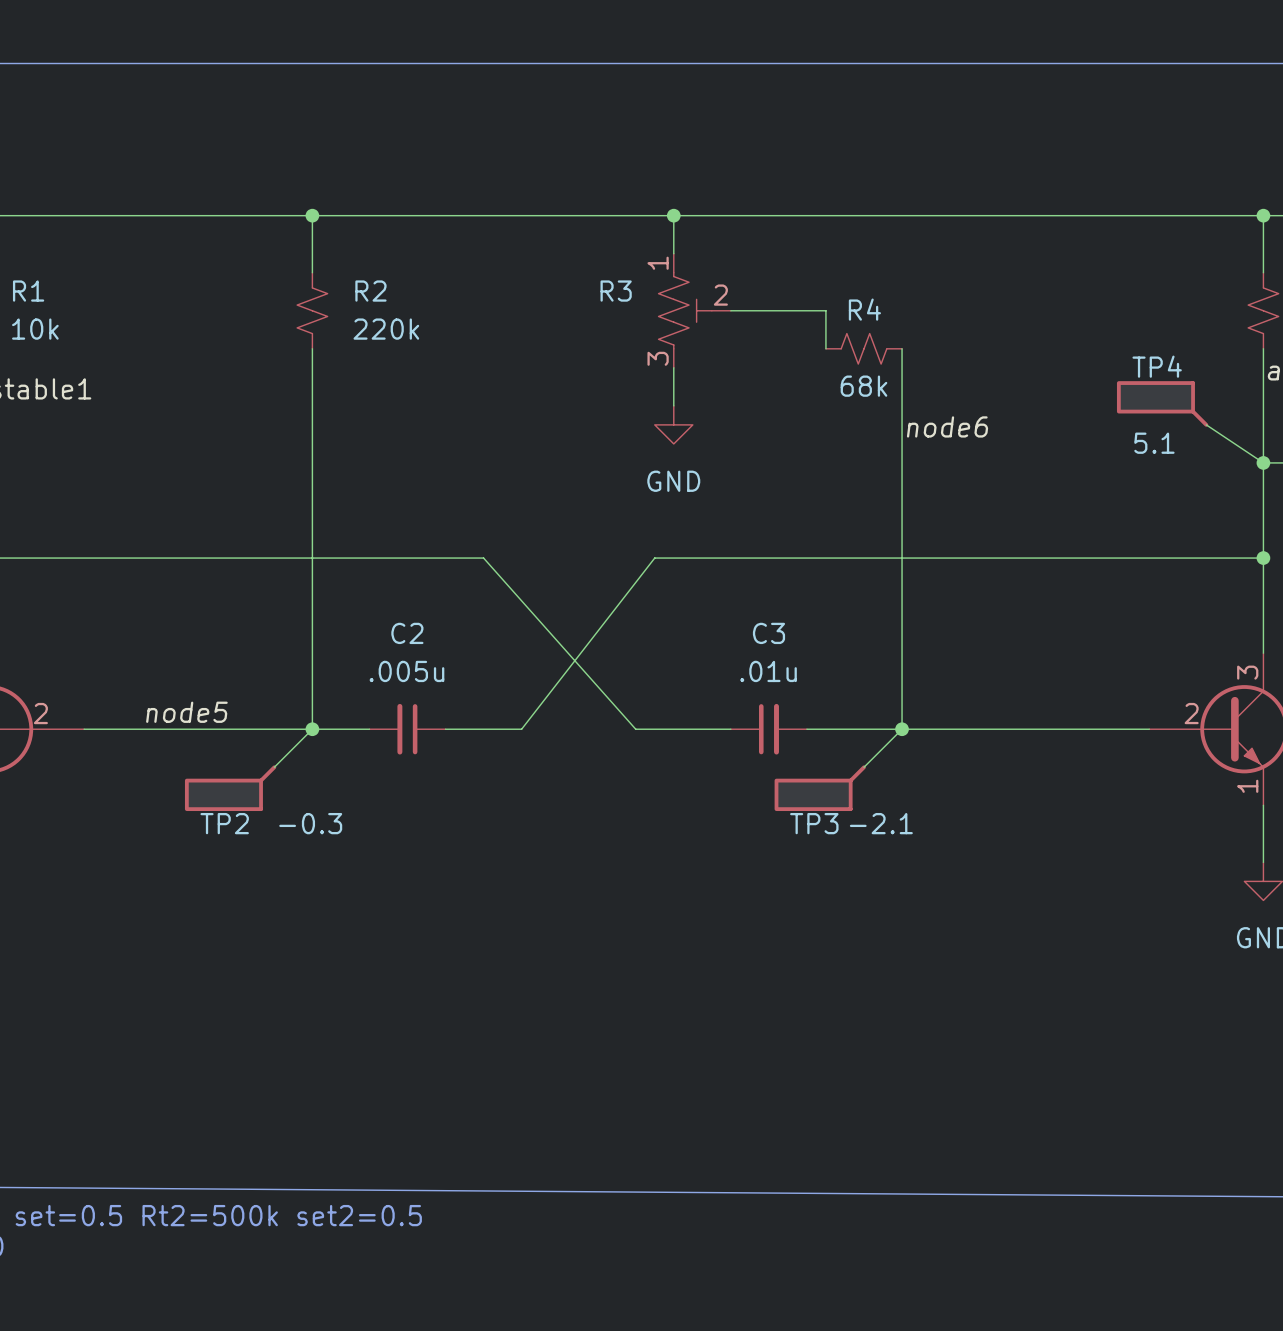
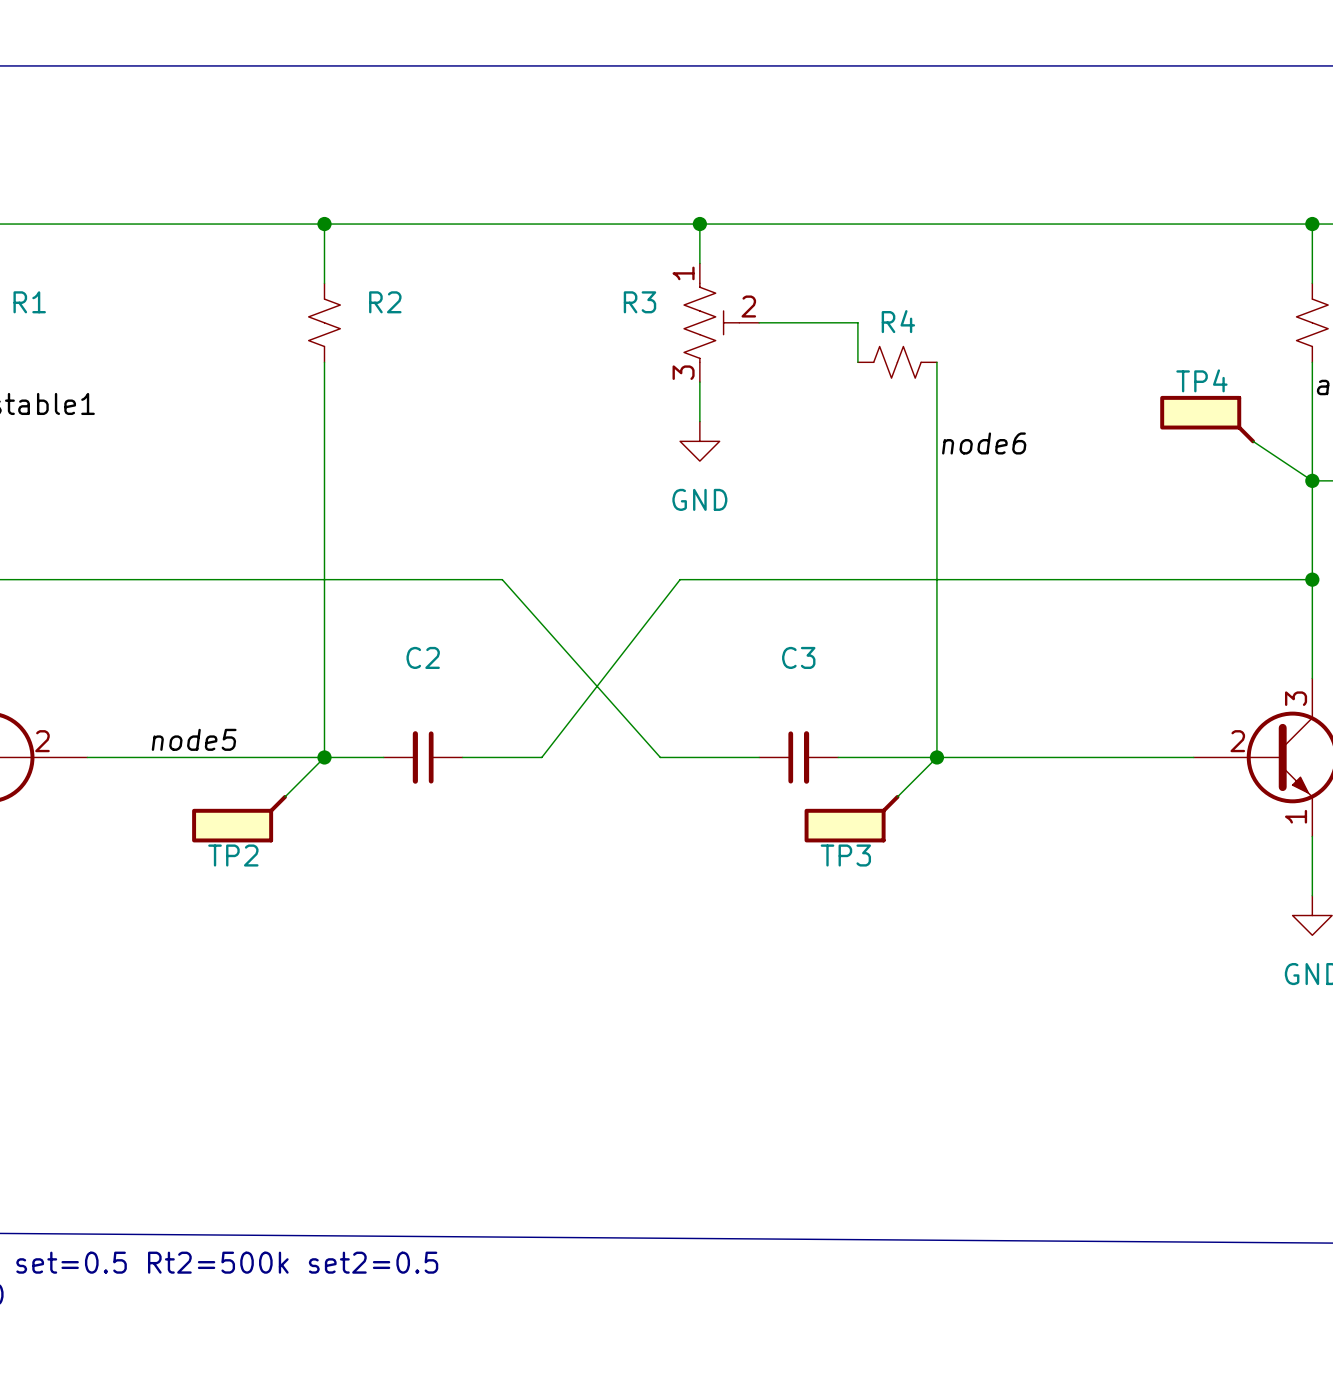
R1 value: 10k (35, 329) -> none
R2 value: 220k (386, 329) -> none
R4 value: 68k (863, 386) -> none
TP4 value: 5.1 (1154, 443) -> none
C2 value: .005u (406, 671) -> none
C3 value: .01u (768, 671) -> none
TP2 value: -0.3 (310, 823) -> none
TP3 value: -2.1 (881, 823) -> none

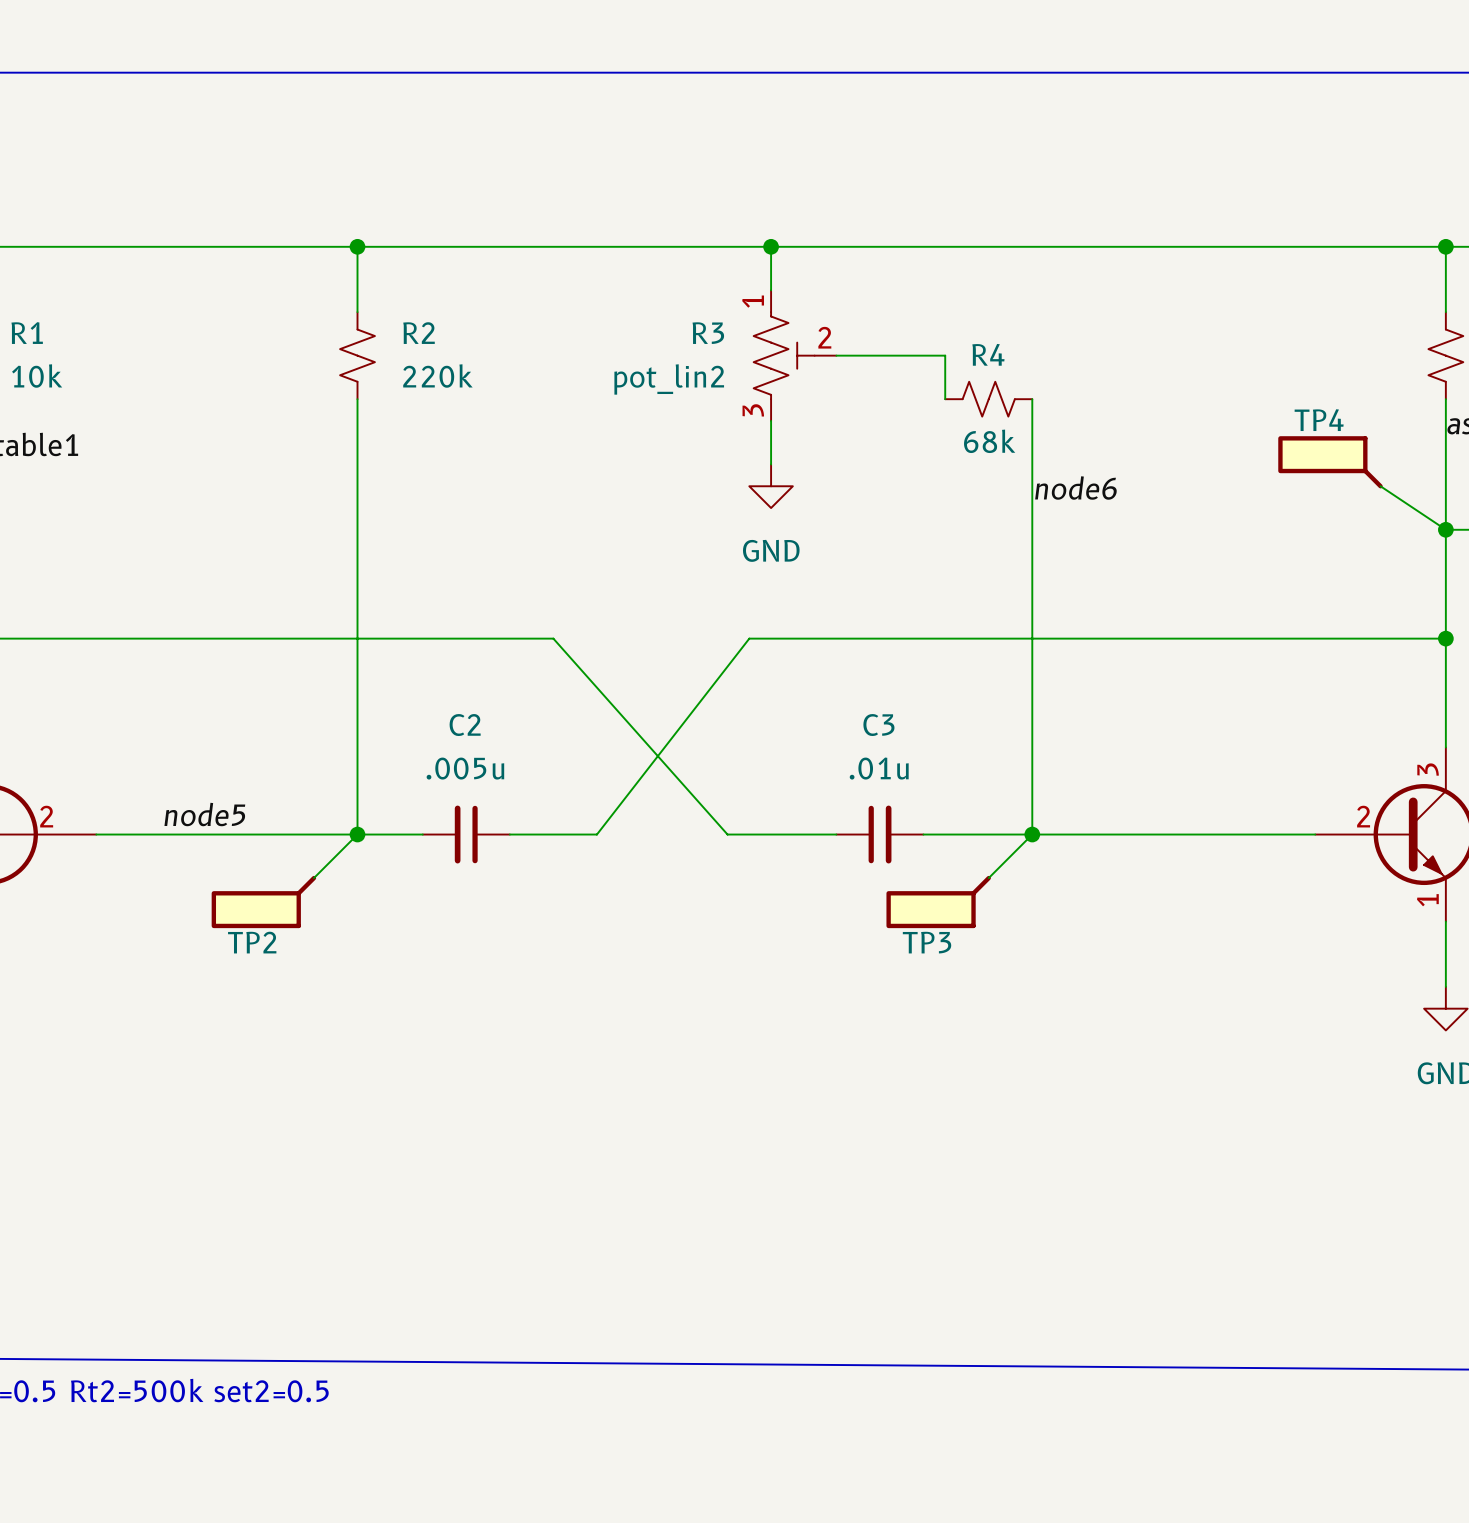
R1 value: none -> 10k (37, 376)
R2 value: none -> 220k (437, 376)
R3 value: none -> pot_lin2 (669, 379)
R4 value: none -> 68k (989, 441)
C2 value: none -> .005u (465, 768)
C3 value: none -> .01u (879, 768)

